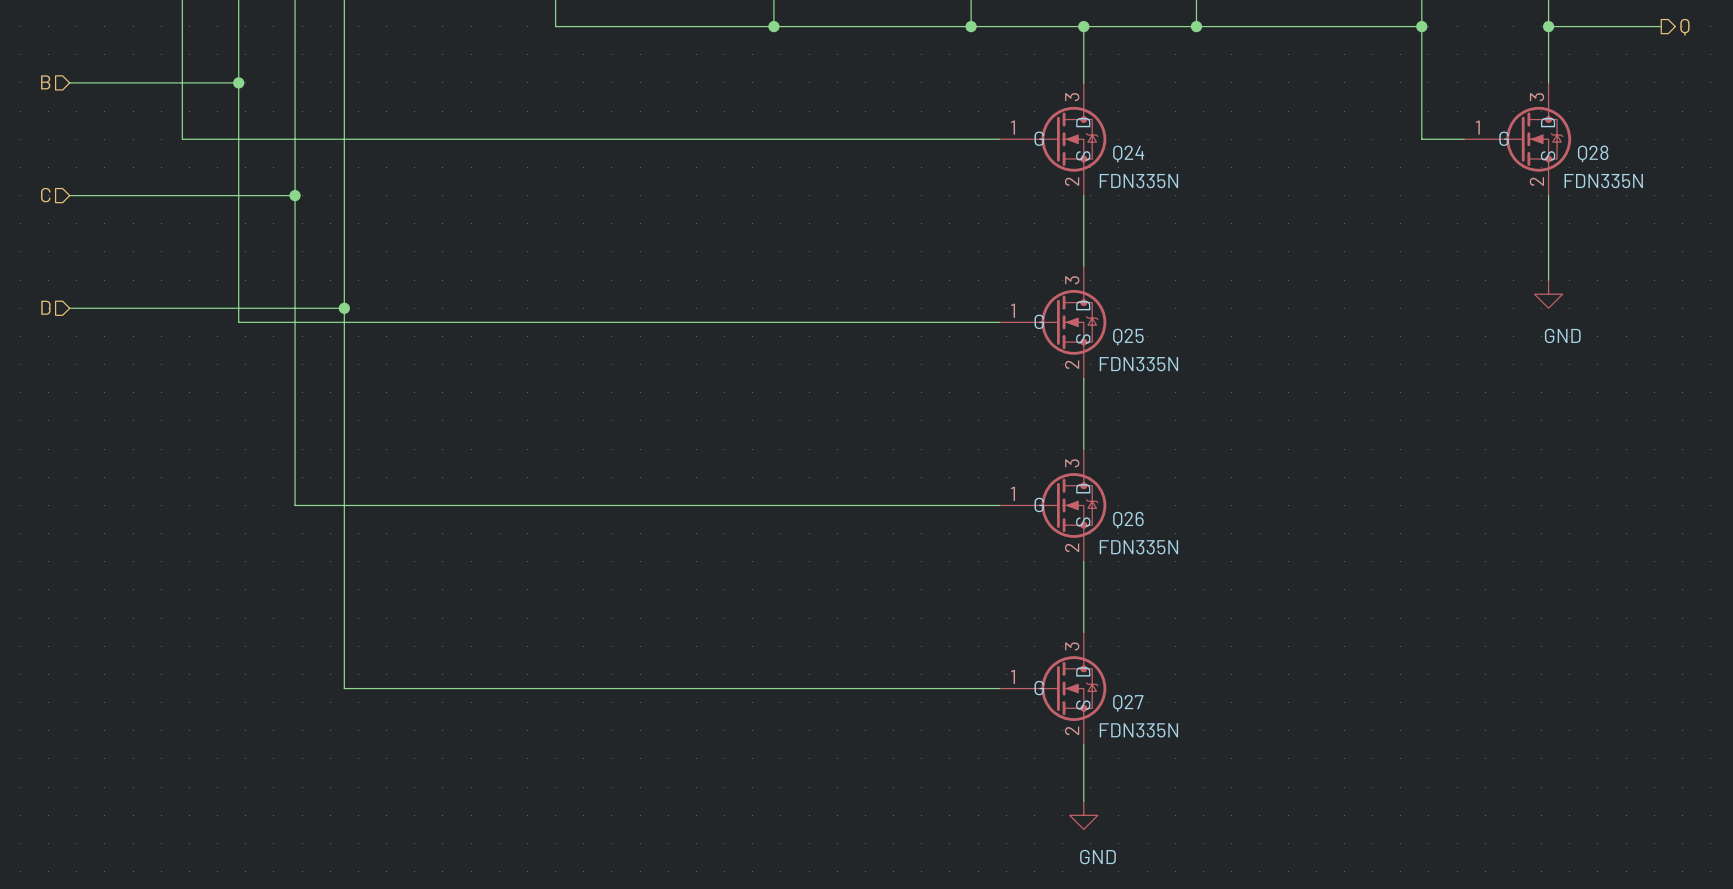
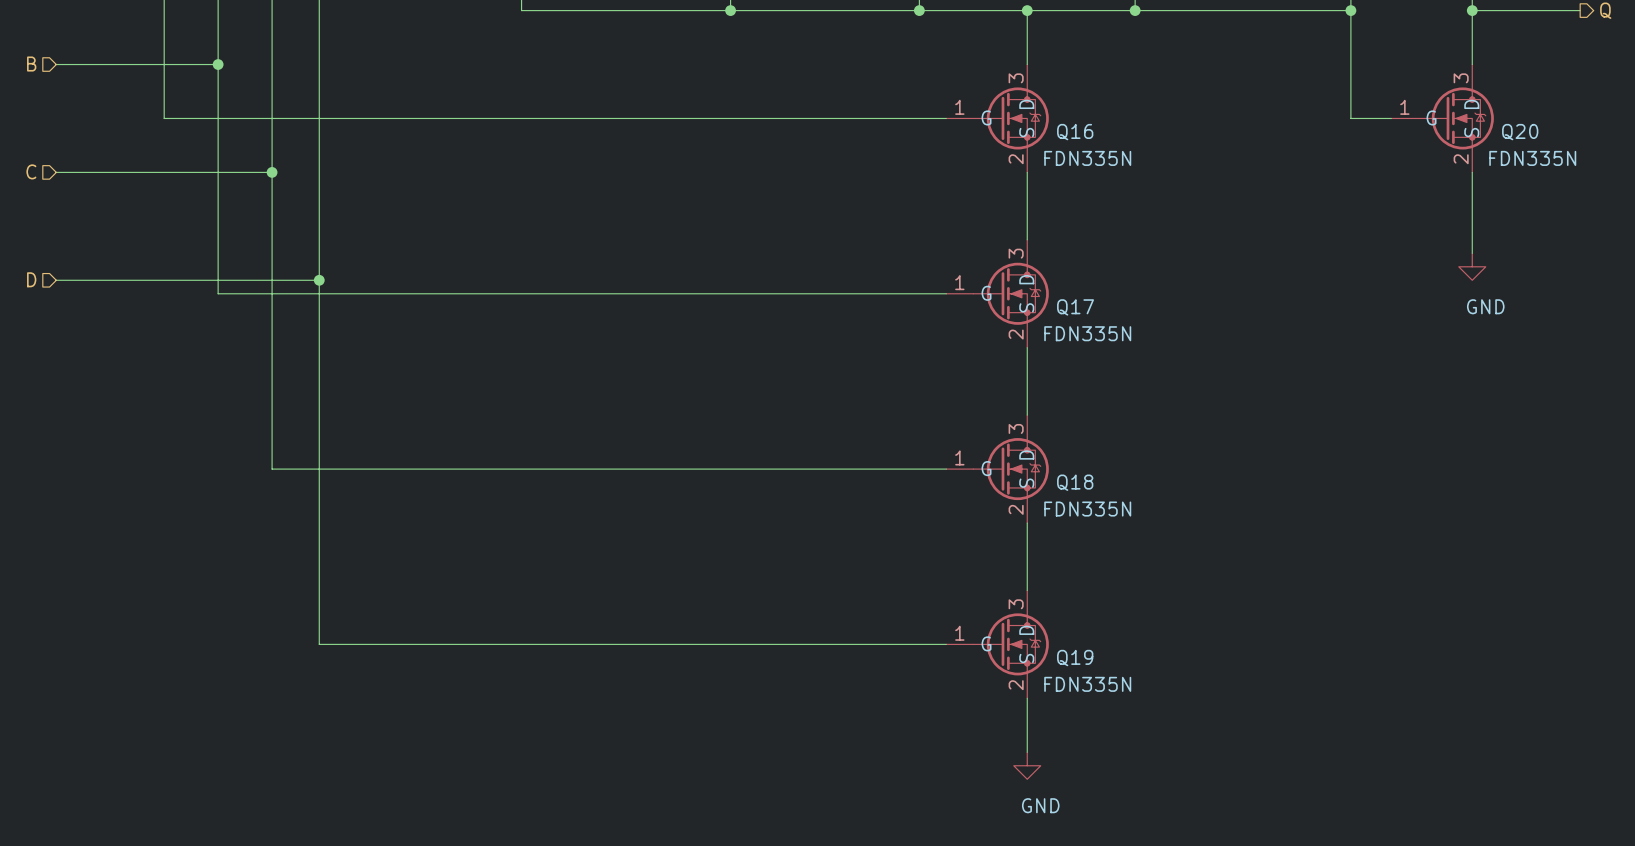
Q24 name: Q24 (1128, 153) -> Q16 (1075, 132)
Q28 name: Q28 (1593, 153) -> Q20 (1520, 132)
Q25 name: Q25 (1128, 337) -> Q17 (1075, 307)
Q26 name: Q26 (1128, 520) -> Q18 (1075, 482)
Q27 name: Q27 (1128, 703) -> Q19 (1075, 658)

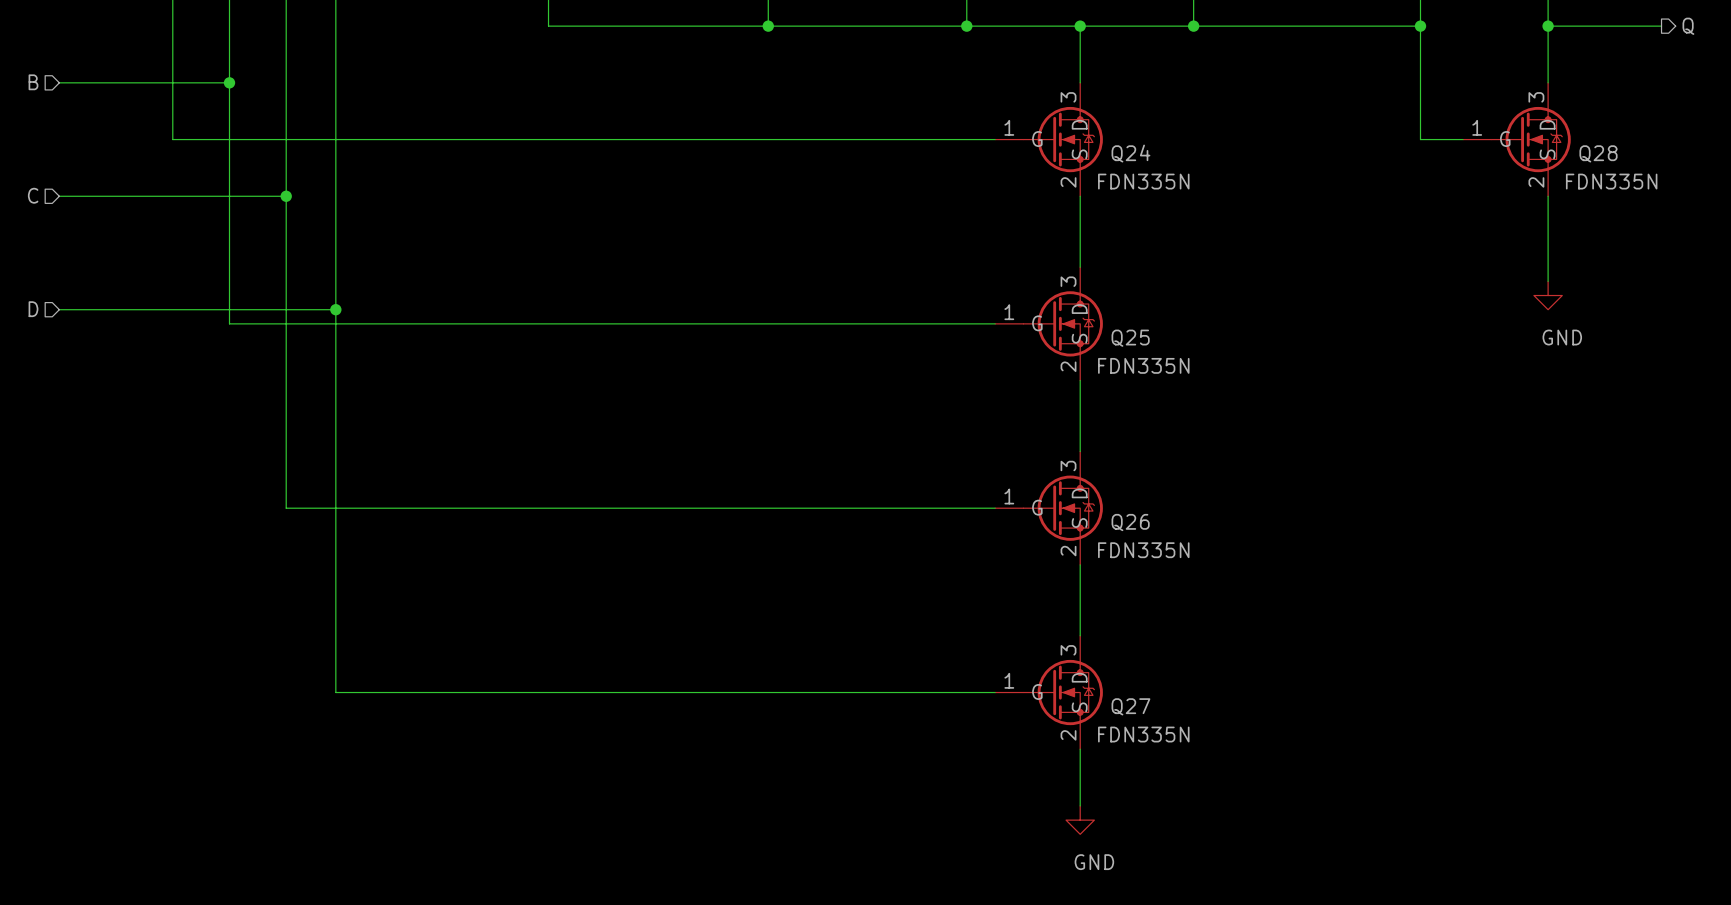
Q16 name: Q16 (1075, 132) -> Q24 (1130, 153)
Q20 name: Q20 (1520, 132) -> Q28 (1598, 153)
Q17 name: Q17 (1075, 307) -> Q25 (1130, 338)
Q18 name: Q18 (1075, 482) -> Q26 (1130, 522)
Q19 name: Q19 (1075, 658) -> Q27 (1130, 706)

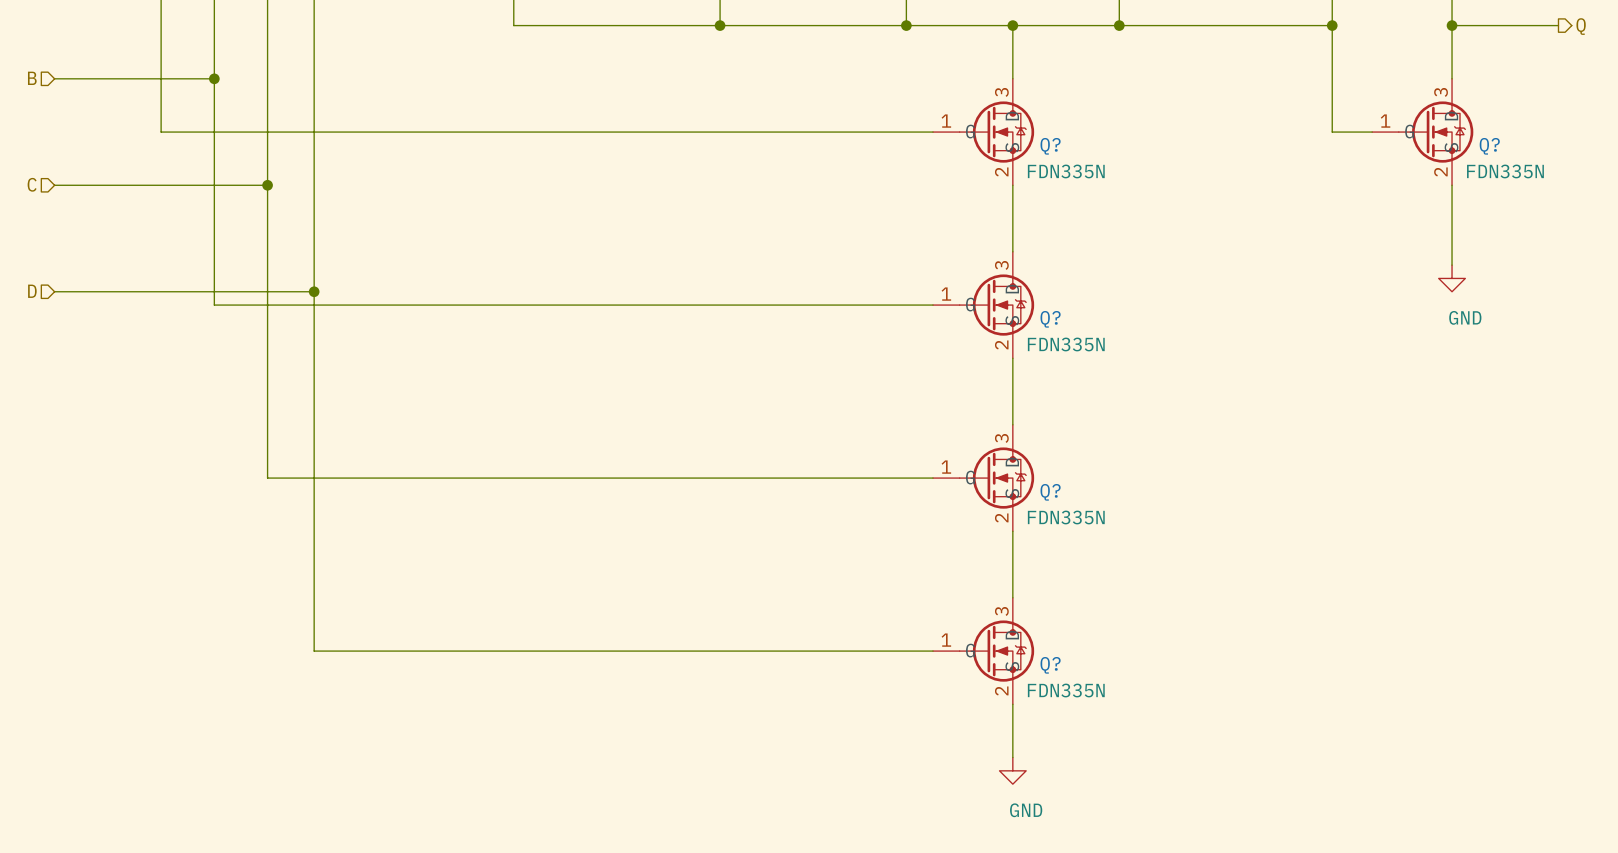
Q24 name: Q24 (1130, 153) -> Q? (1050, 146)
Q28 name: Q28 (1598, 153) -> Q? (1489, 146)
Q25 name: Q25 (1130, 338) -> Q? (1050, 319)
Q26 name: Q26 (1130, 522) -> Q? (1050, 492)
Q27 name: Q27 (1130, 706) -> Q? (1050, 665)

